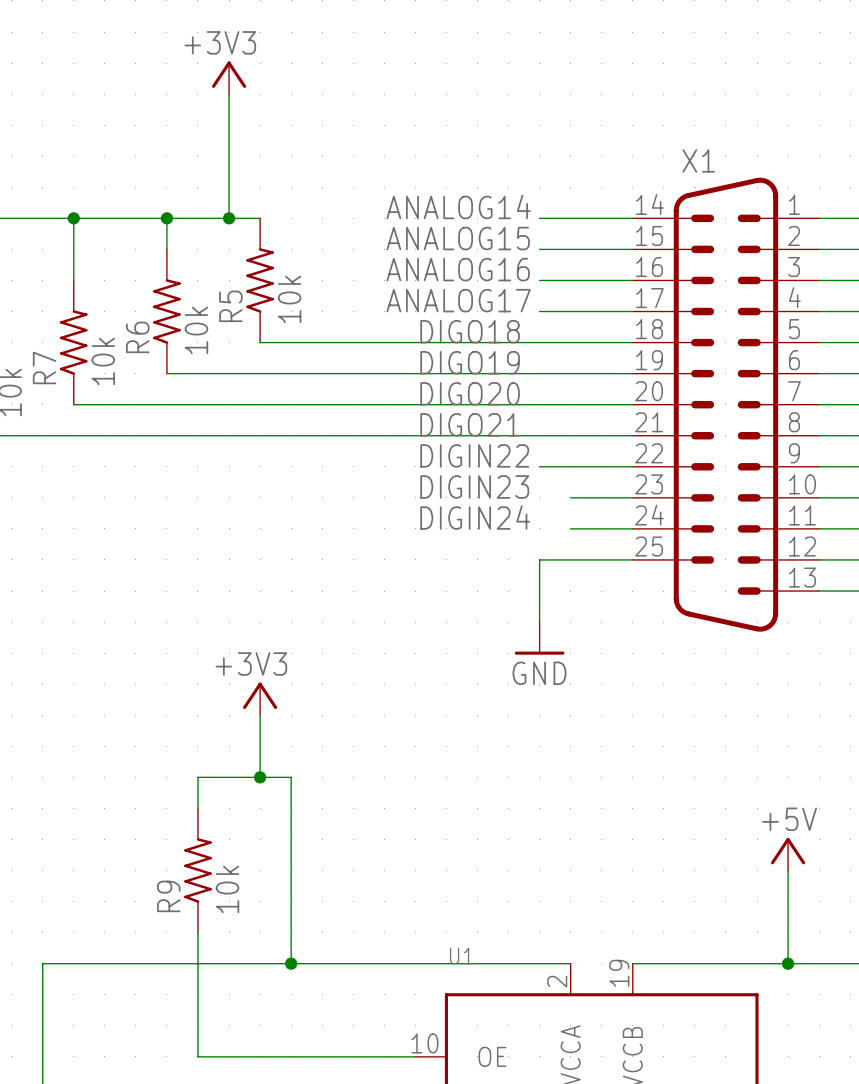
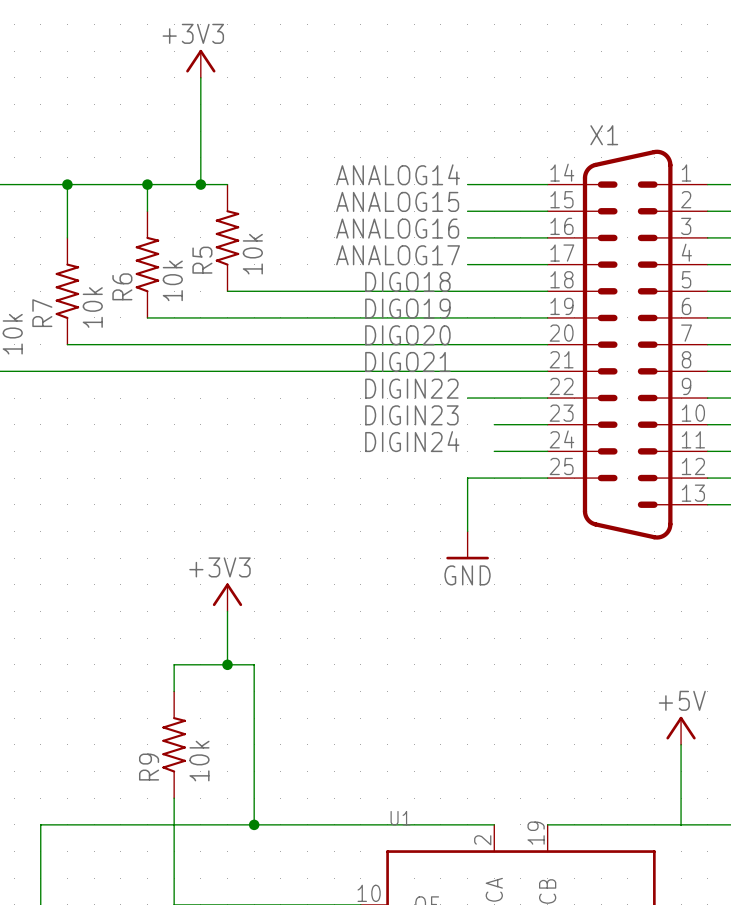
junction: (788, 963) -> none

